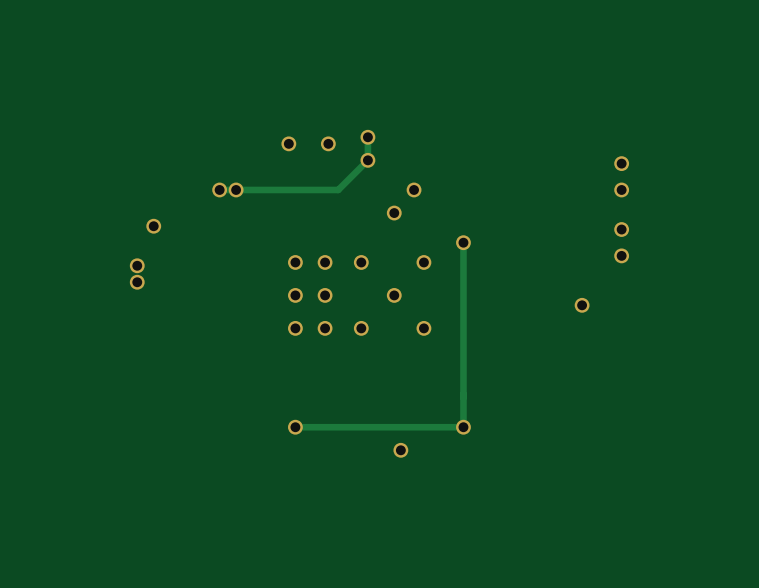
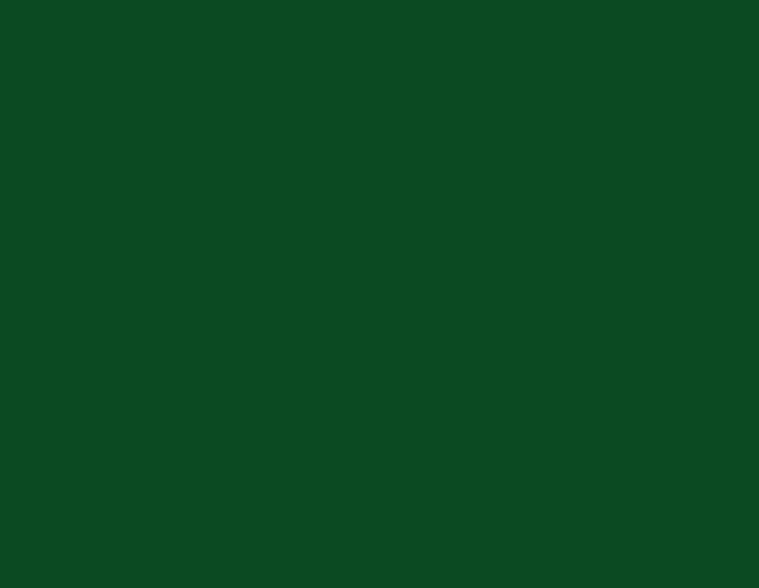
track: (367, 137) (367, 160) (338, 189) (219, 189) -> none
via: (367, 137) -> none
via: (288, 143) -> none
via: (328, 143) -> none
via: (367, 160) -> none
via: (621, 163) -> none
via: (219, 189) -> none
via: (236, 189) -> none
via: (414, 189) -> none
via: (621, 189) -> none
via: (394, 213) -> none
via: (153, 226) -> none
via: (621, 229) -> none
track: (463, 242) (463, 427) (295, 427) -> none
via: (463, 242) -> none
via: (621, 255) -> none
via: (295, 262) -> none
via: (325, 262) -> none
via: (361, 262) -> none
via: (423, 262) -> none
via: (137, 265) -> none
via: (137, 282) -> none
via: (295, 295) -> none
via: (325, 295) -> none
via: (394, 295) -> none
via: (582, 305) -> none
via: (295, 328) -> none
via: (325, 328) -> none
via: (361, 328) -> none
via: (423, 328) -> none
via: (295, 427) -> none
via: (463, 427) -> none
via: (400, 450) -> none

